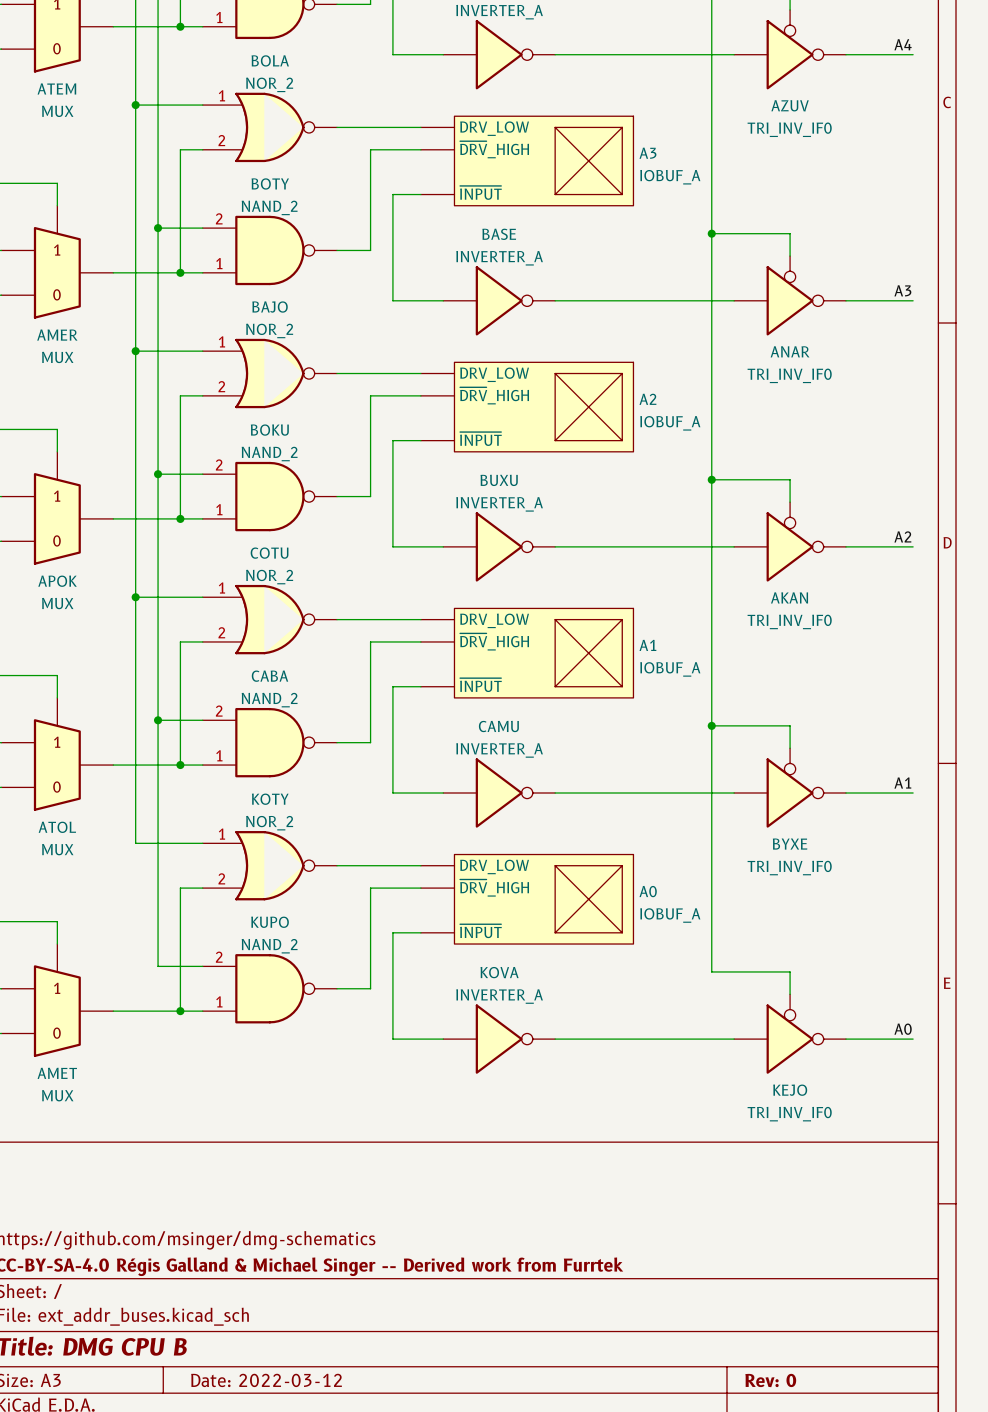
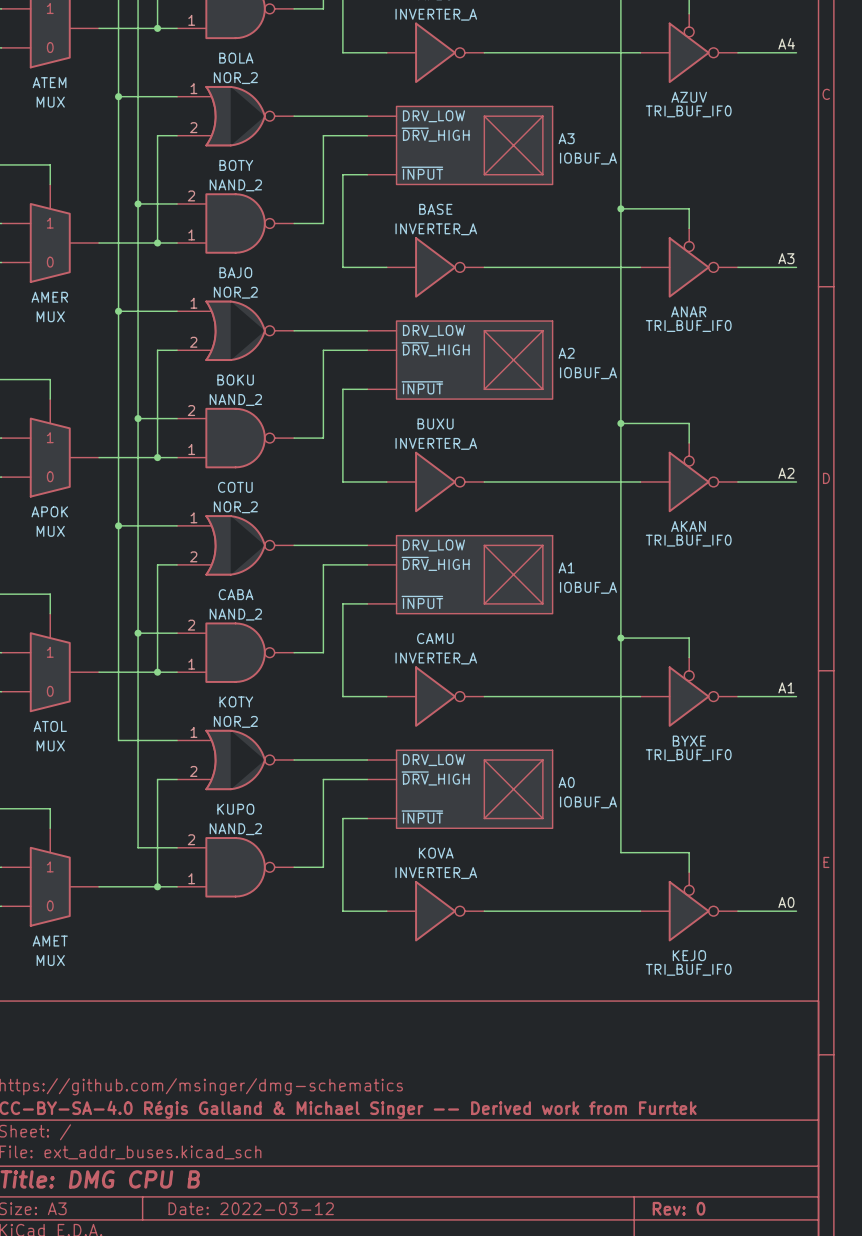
AZUV value: TRI_INV_IF0 (789, 129) -> TRI_BUF_IF0 (688, 111)
ANAR value: TRI_INV_IF0 (789, 375) -> TRI_BUF_IF0 (688, 326)
AKAN value: TRI_INV_IF0 (789, 621) -> TRI_BUF_IF0 (688, 540)
BYXE value: TRI_INV_IF0 (789, 868) -> TRI_BUF_IF0 (688, 755)
KEJO value: TRI_INV_IF0 (789, 1114) -> TRI_BUF_IF0 (688, 969)

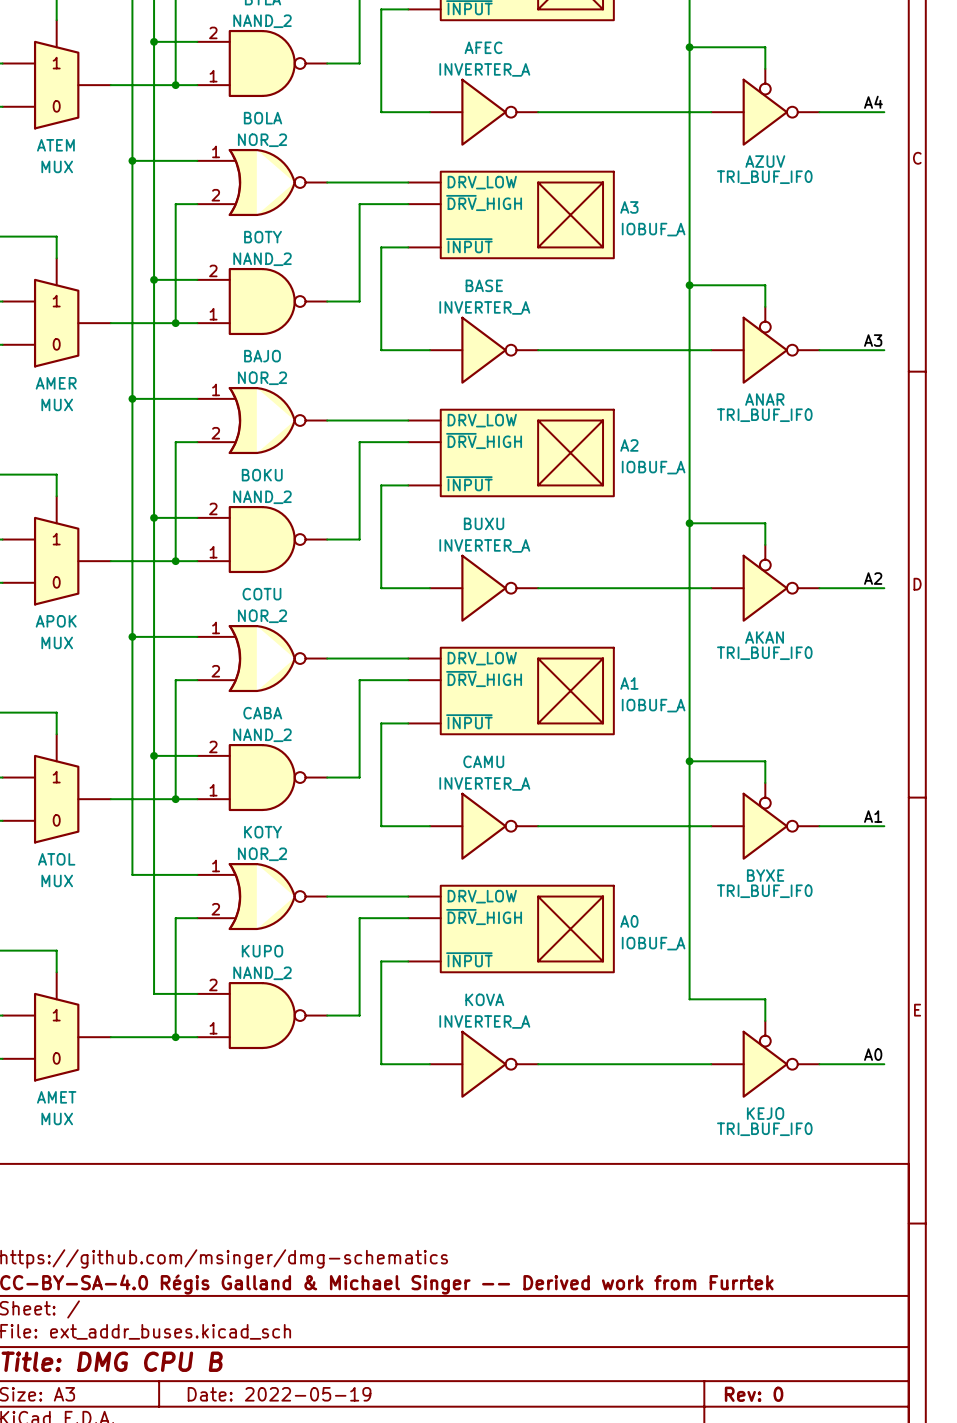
title block: Date: 2022-03-12 (251, 1208) -> Date: 2022-05-19 (279, 1394)

